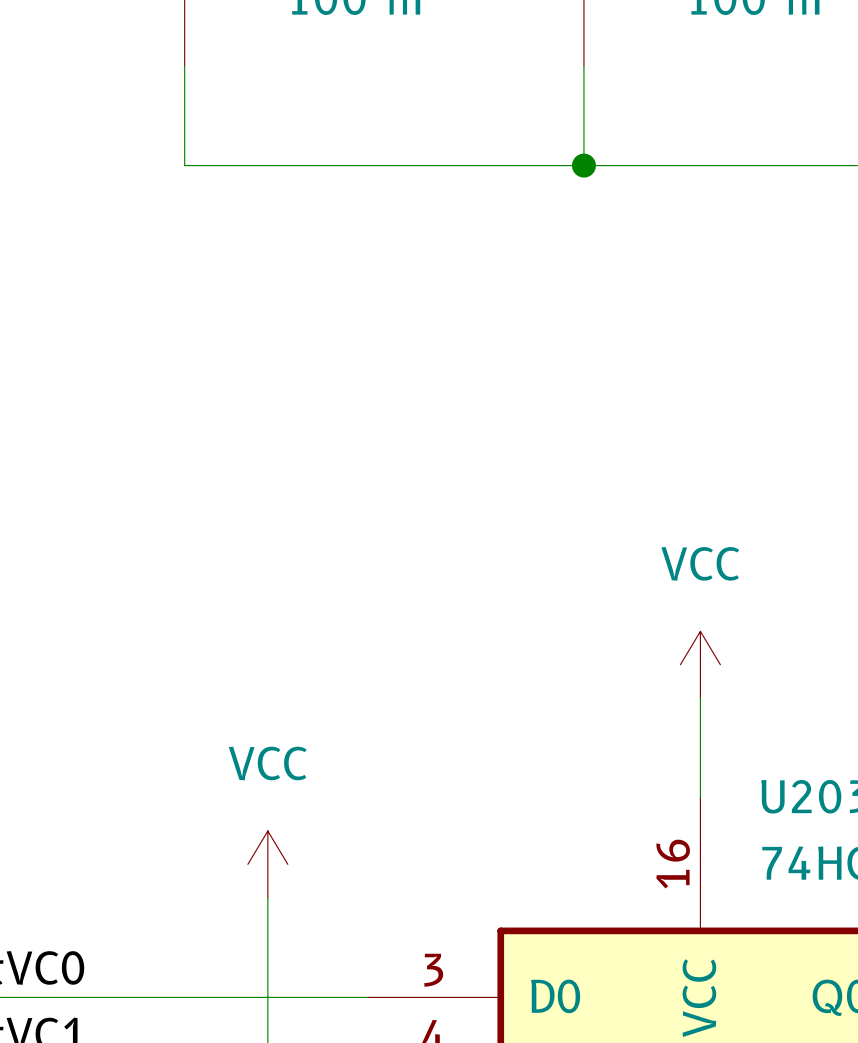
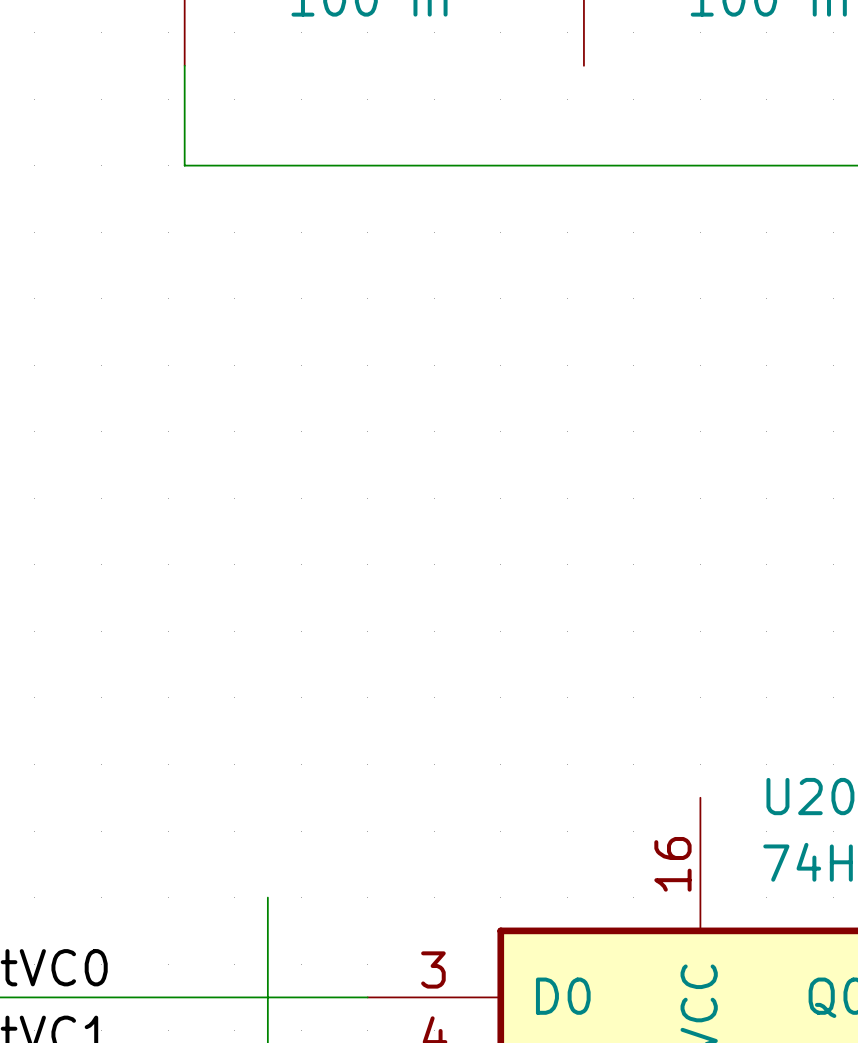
wire: (583, 65) (583, 165) -> none
junction: (583, 165) -> none
power symbol: VCC (700, 664) -> none
wire: (700, 697) (700, 797) -> none
power symbol: VCC (267, 864) -> none

